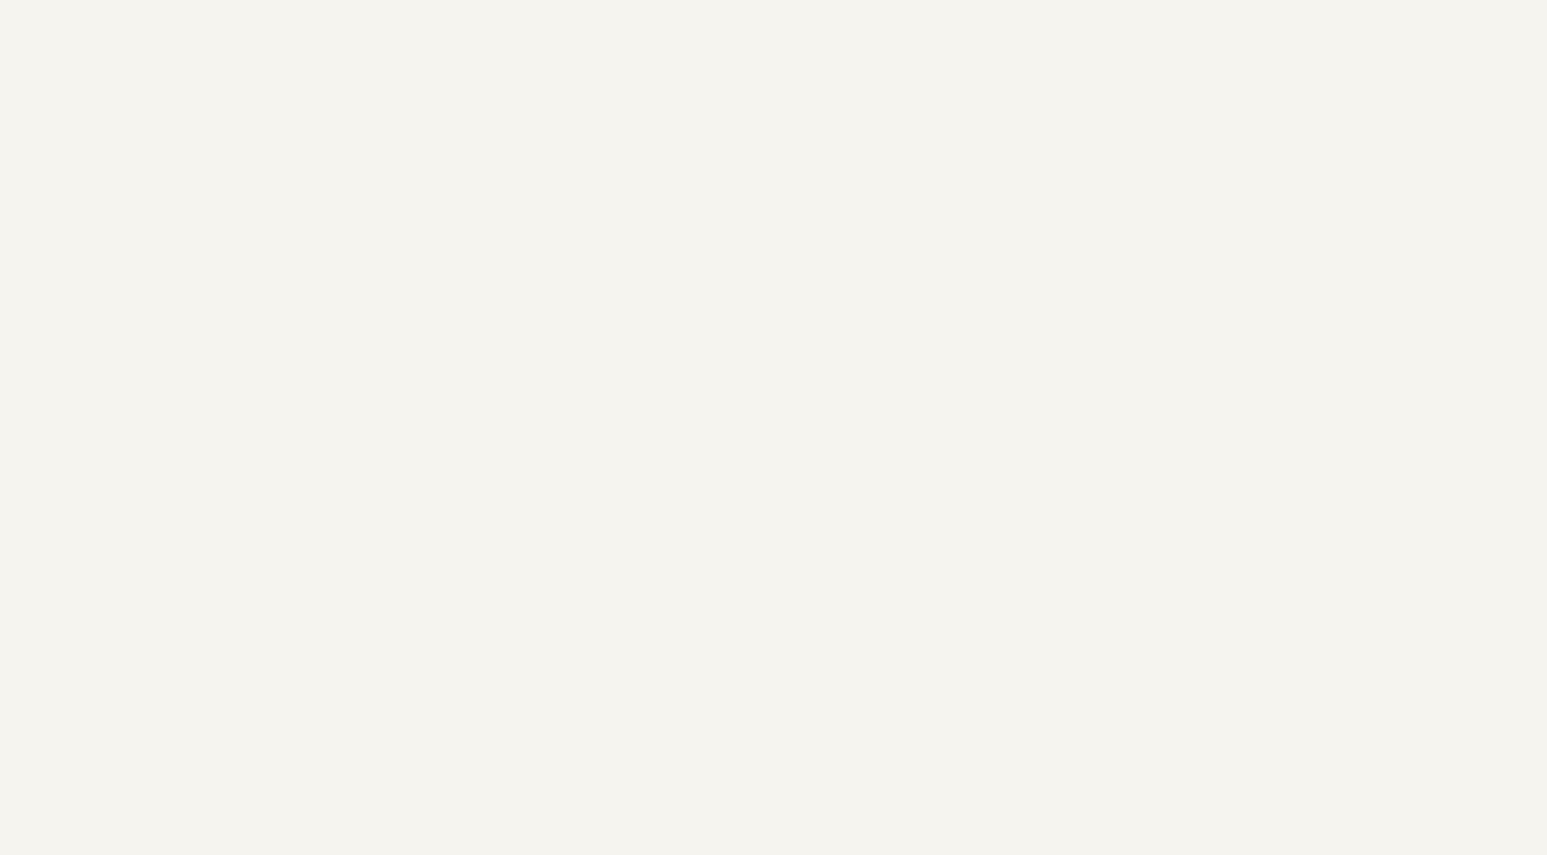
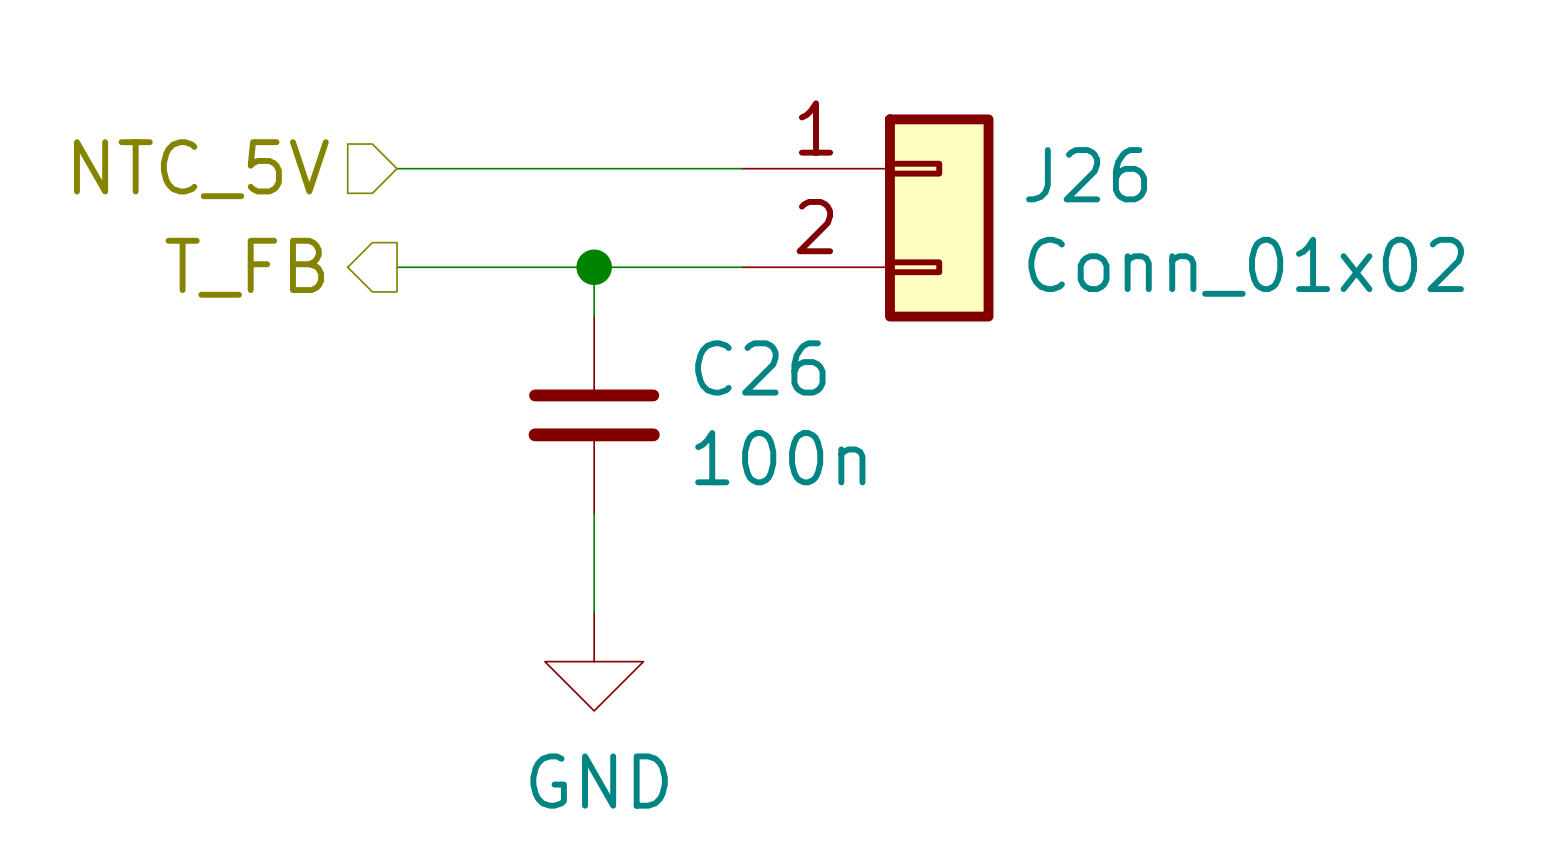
hierarchical label: none -> NTC_5V (201, 169)
wire: none -> (396, 168) (742, 168)
J26: none -> Conn_01x02 (867, 217)
hierarchical label: none -> T_FB (244, 267)
wire: none -> (396, 267) (742, 267)
wire: none -> (594, 267) (594, 316)
junction: none -> (594, 267)
C26: none -> 100n (594, 415)
wire: none -> (594, 513) (594, 612)
power symbol: none -> GND (594, 661)

